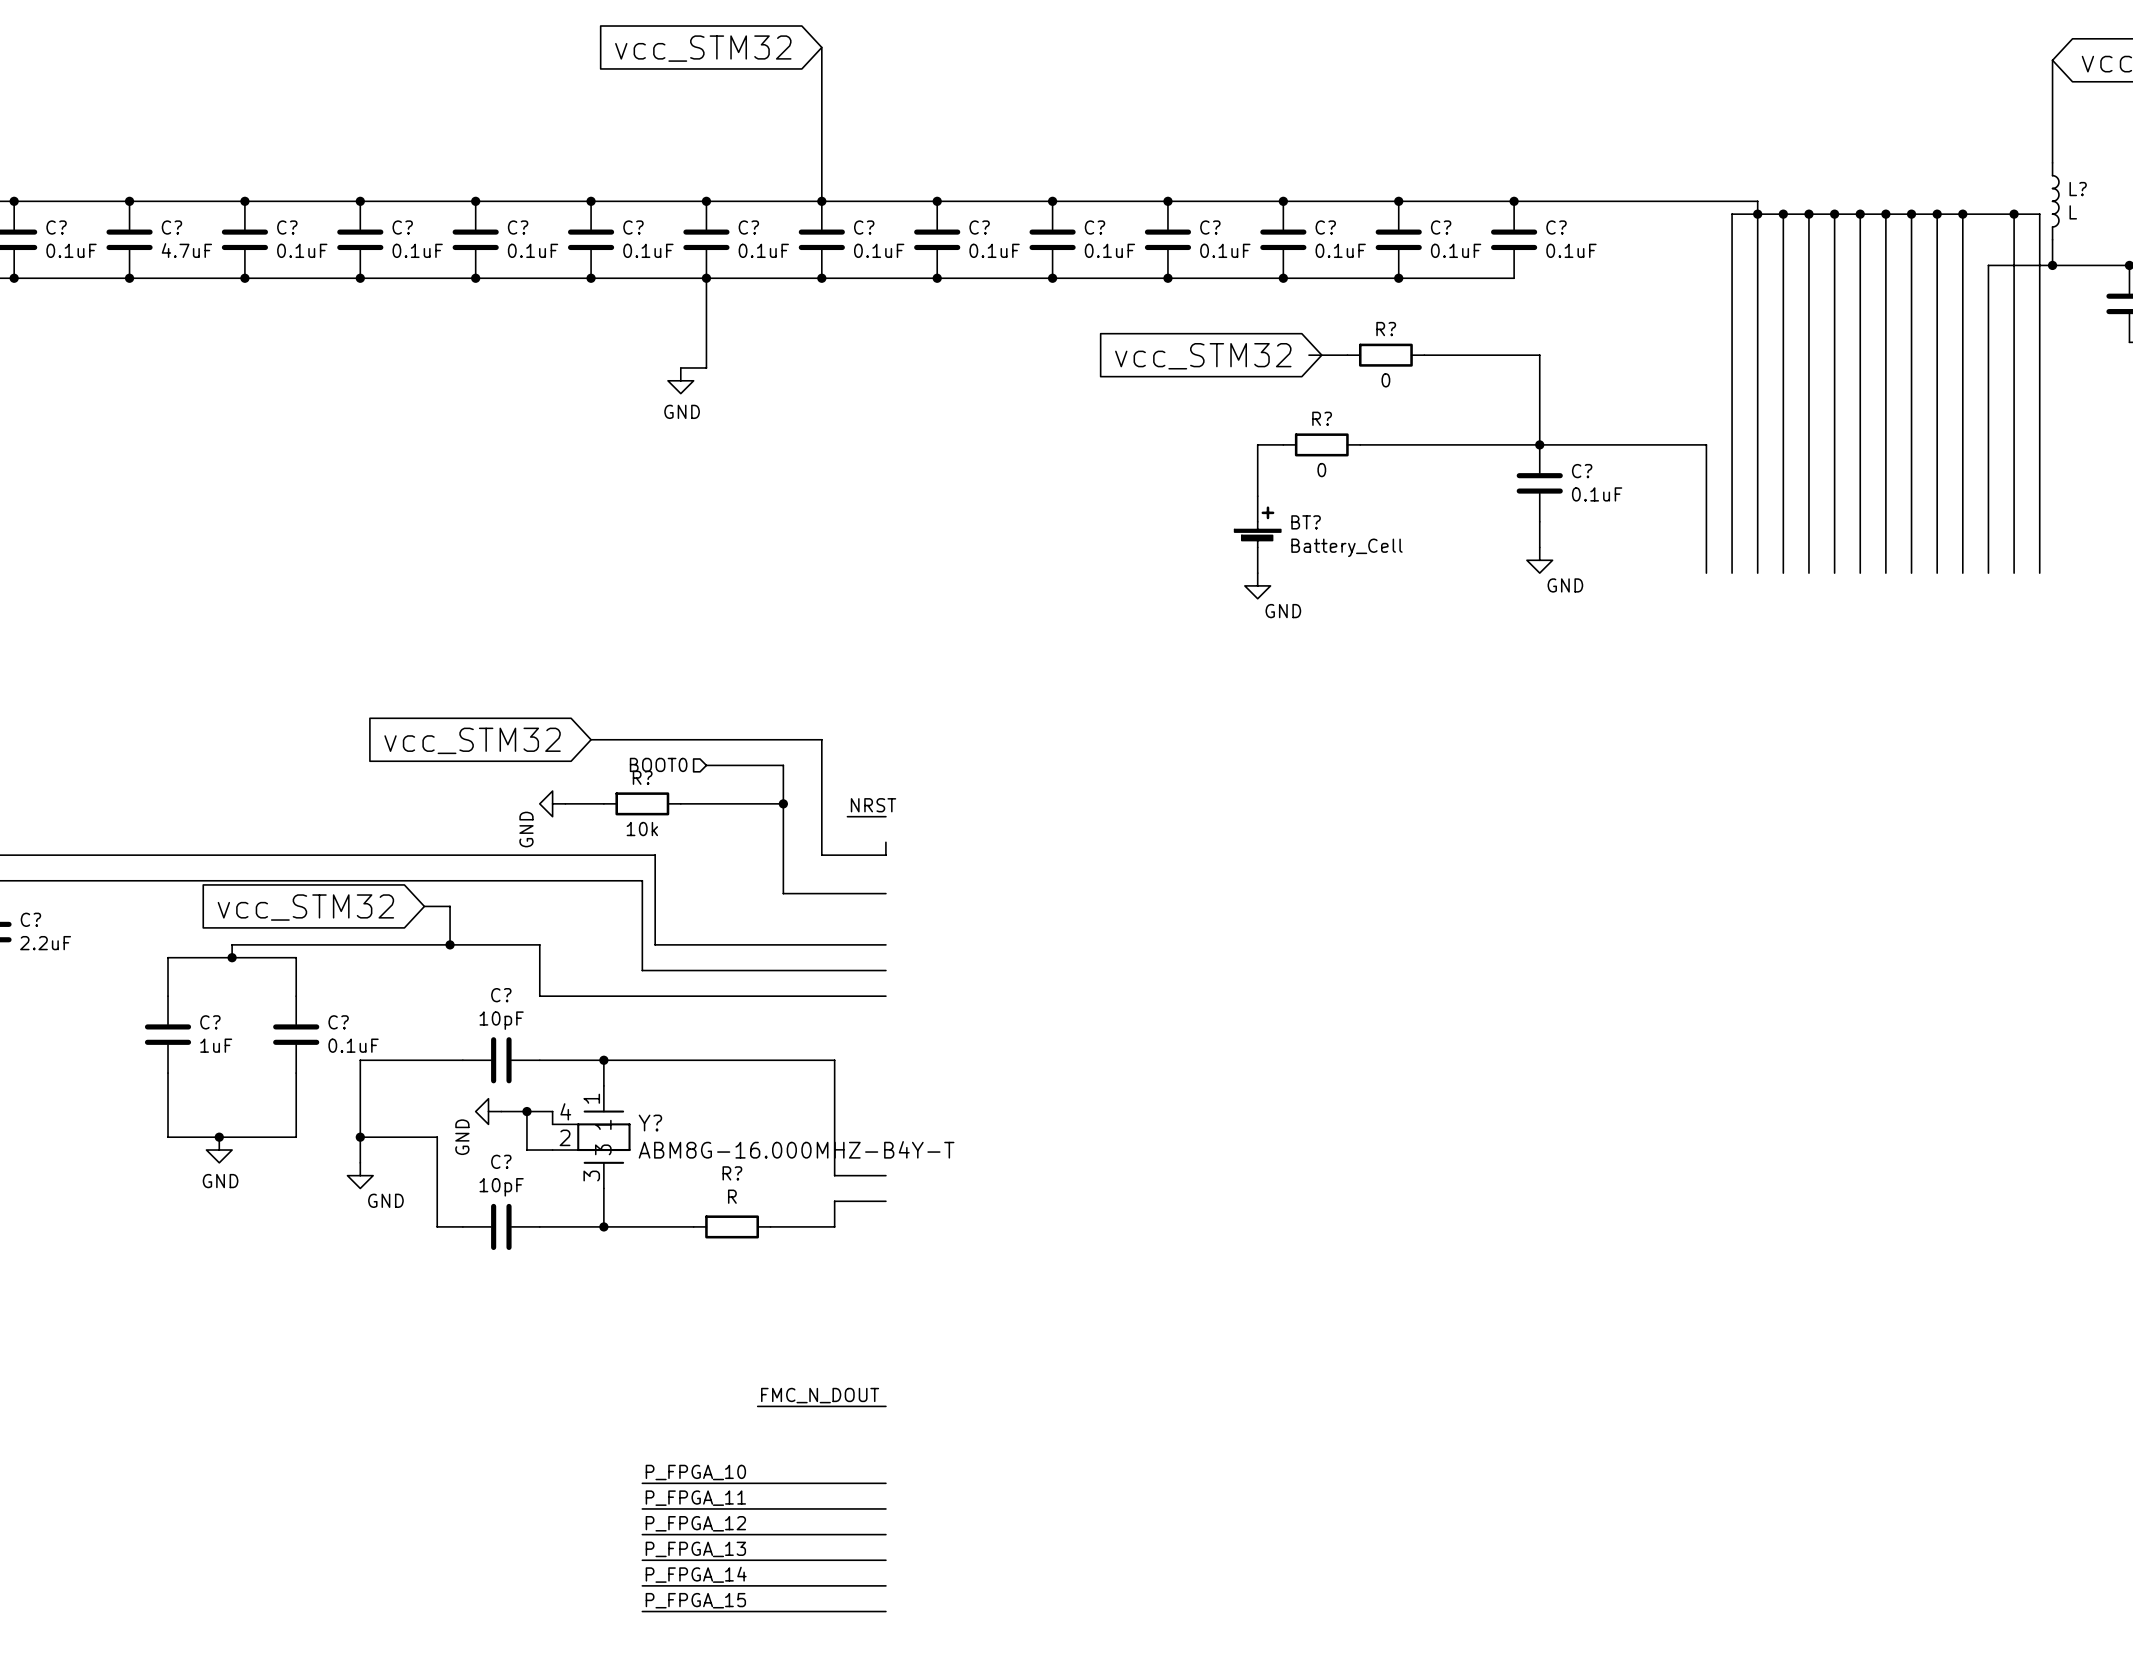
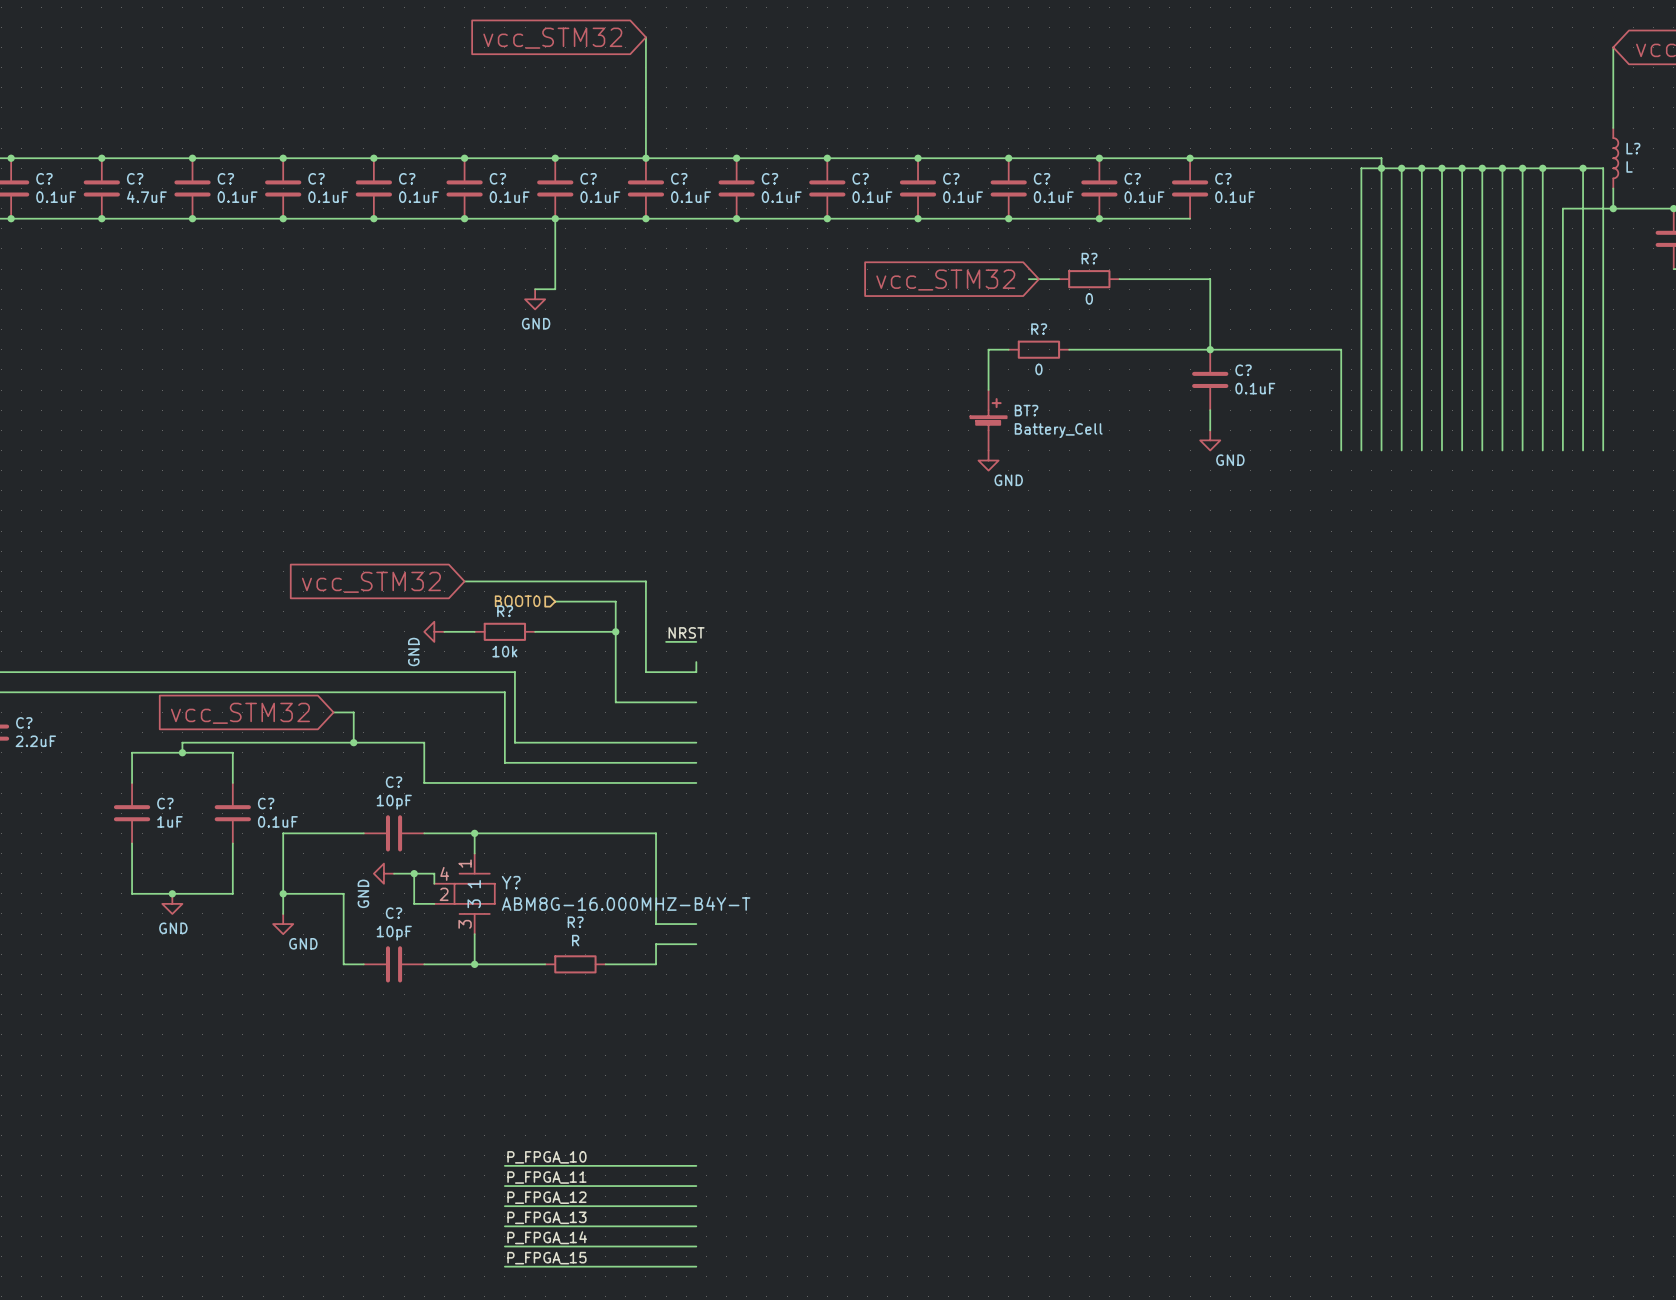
label: FMC_N_DOUT (820, 1395) -> none
wire: (757, 1406) (885, 1406) -> none

